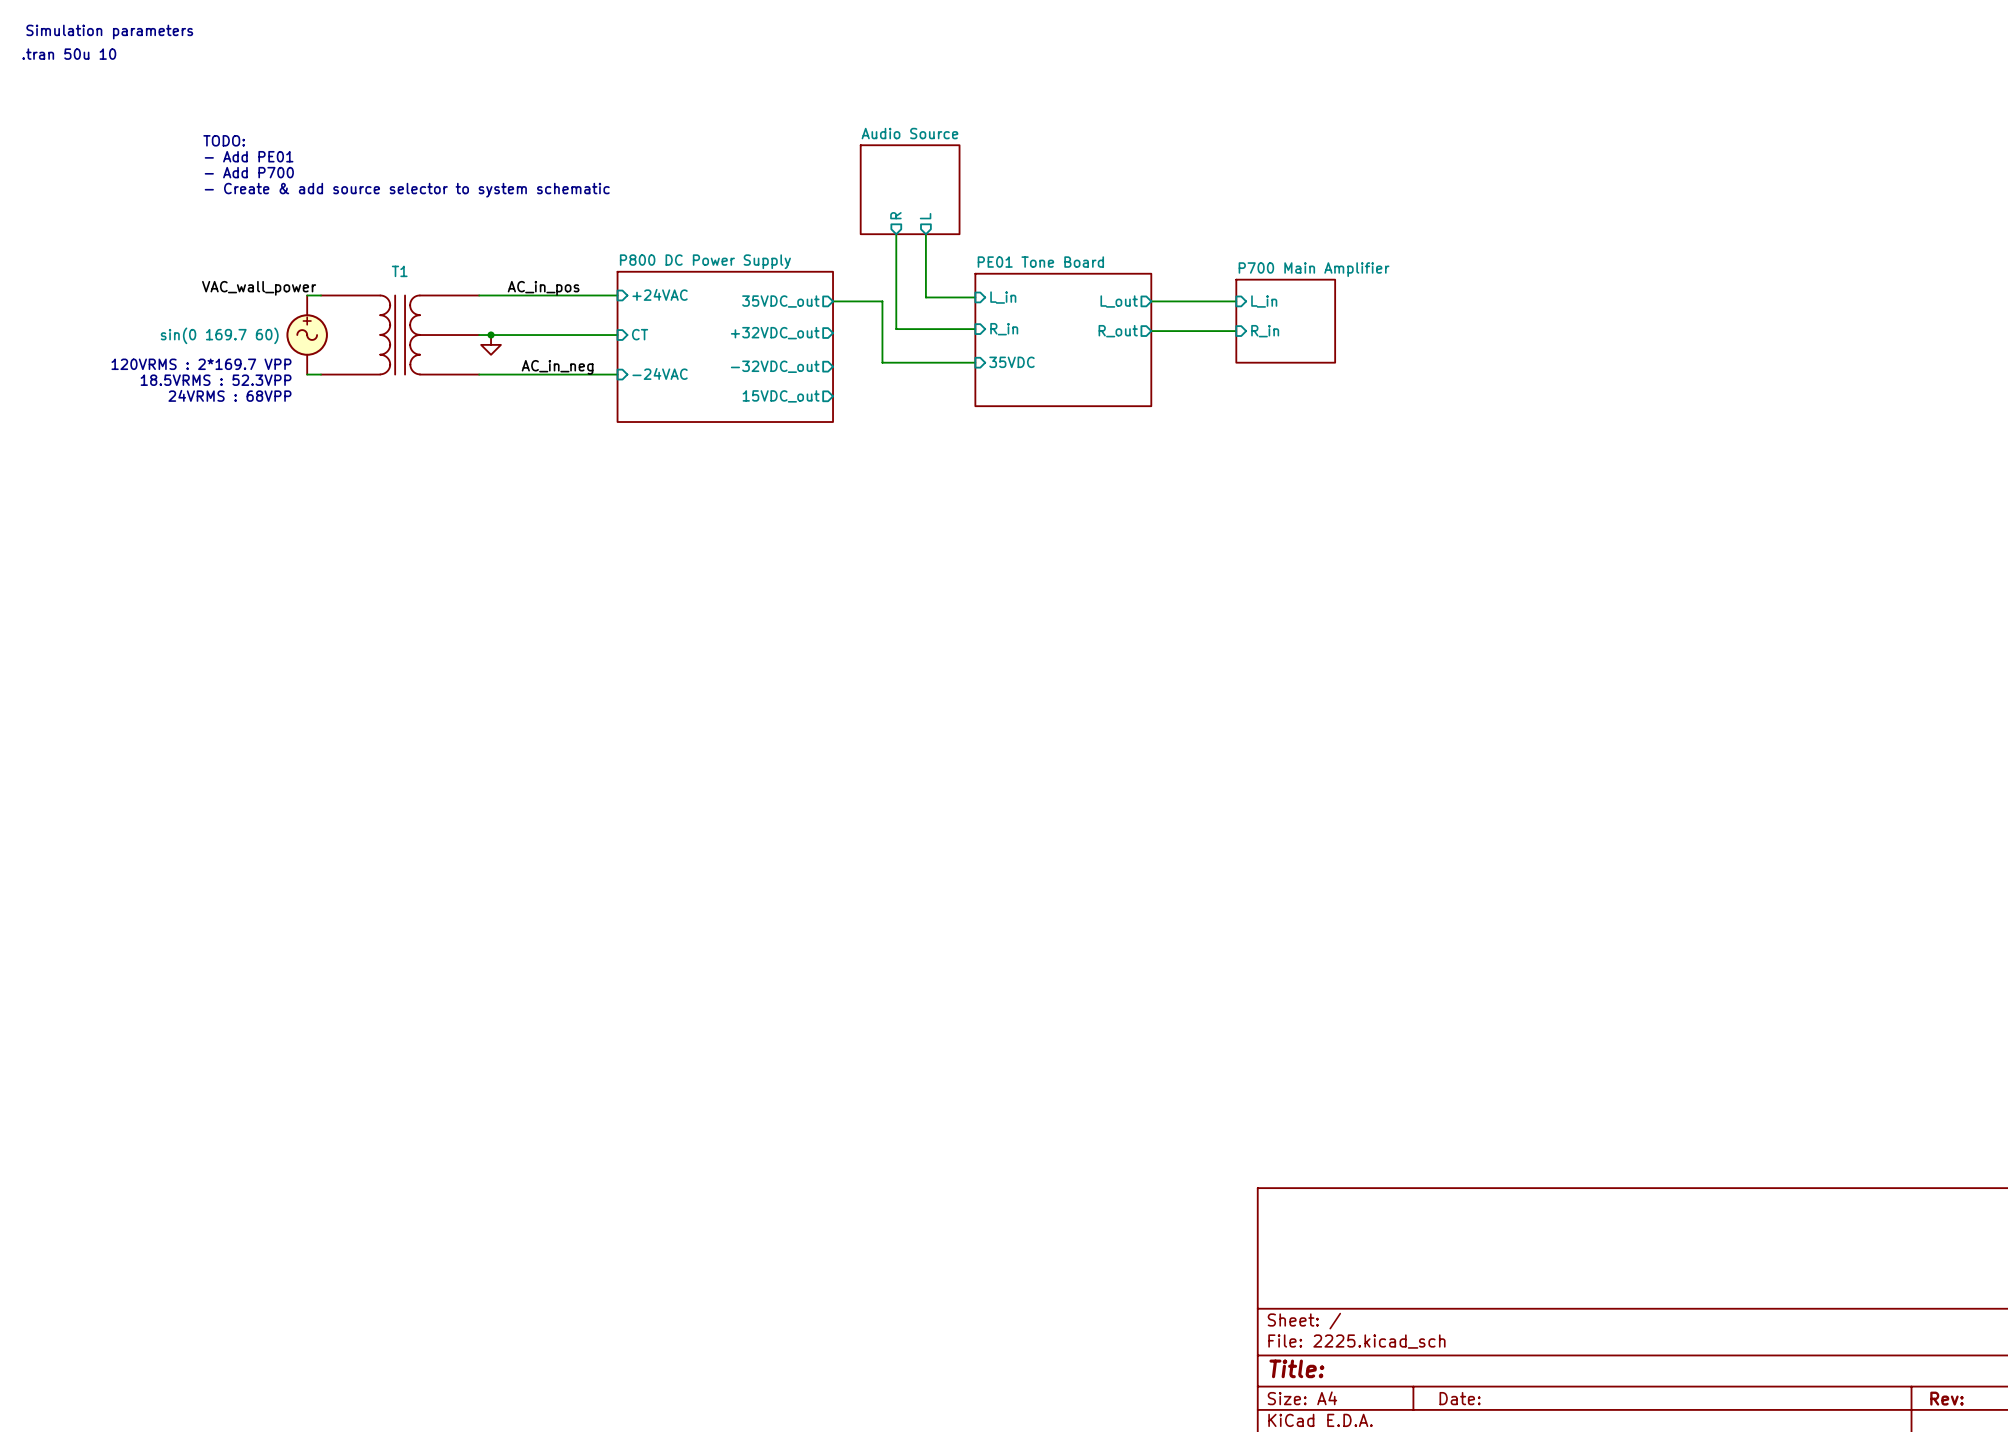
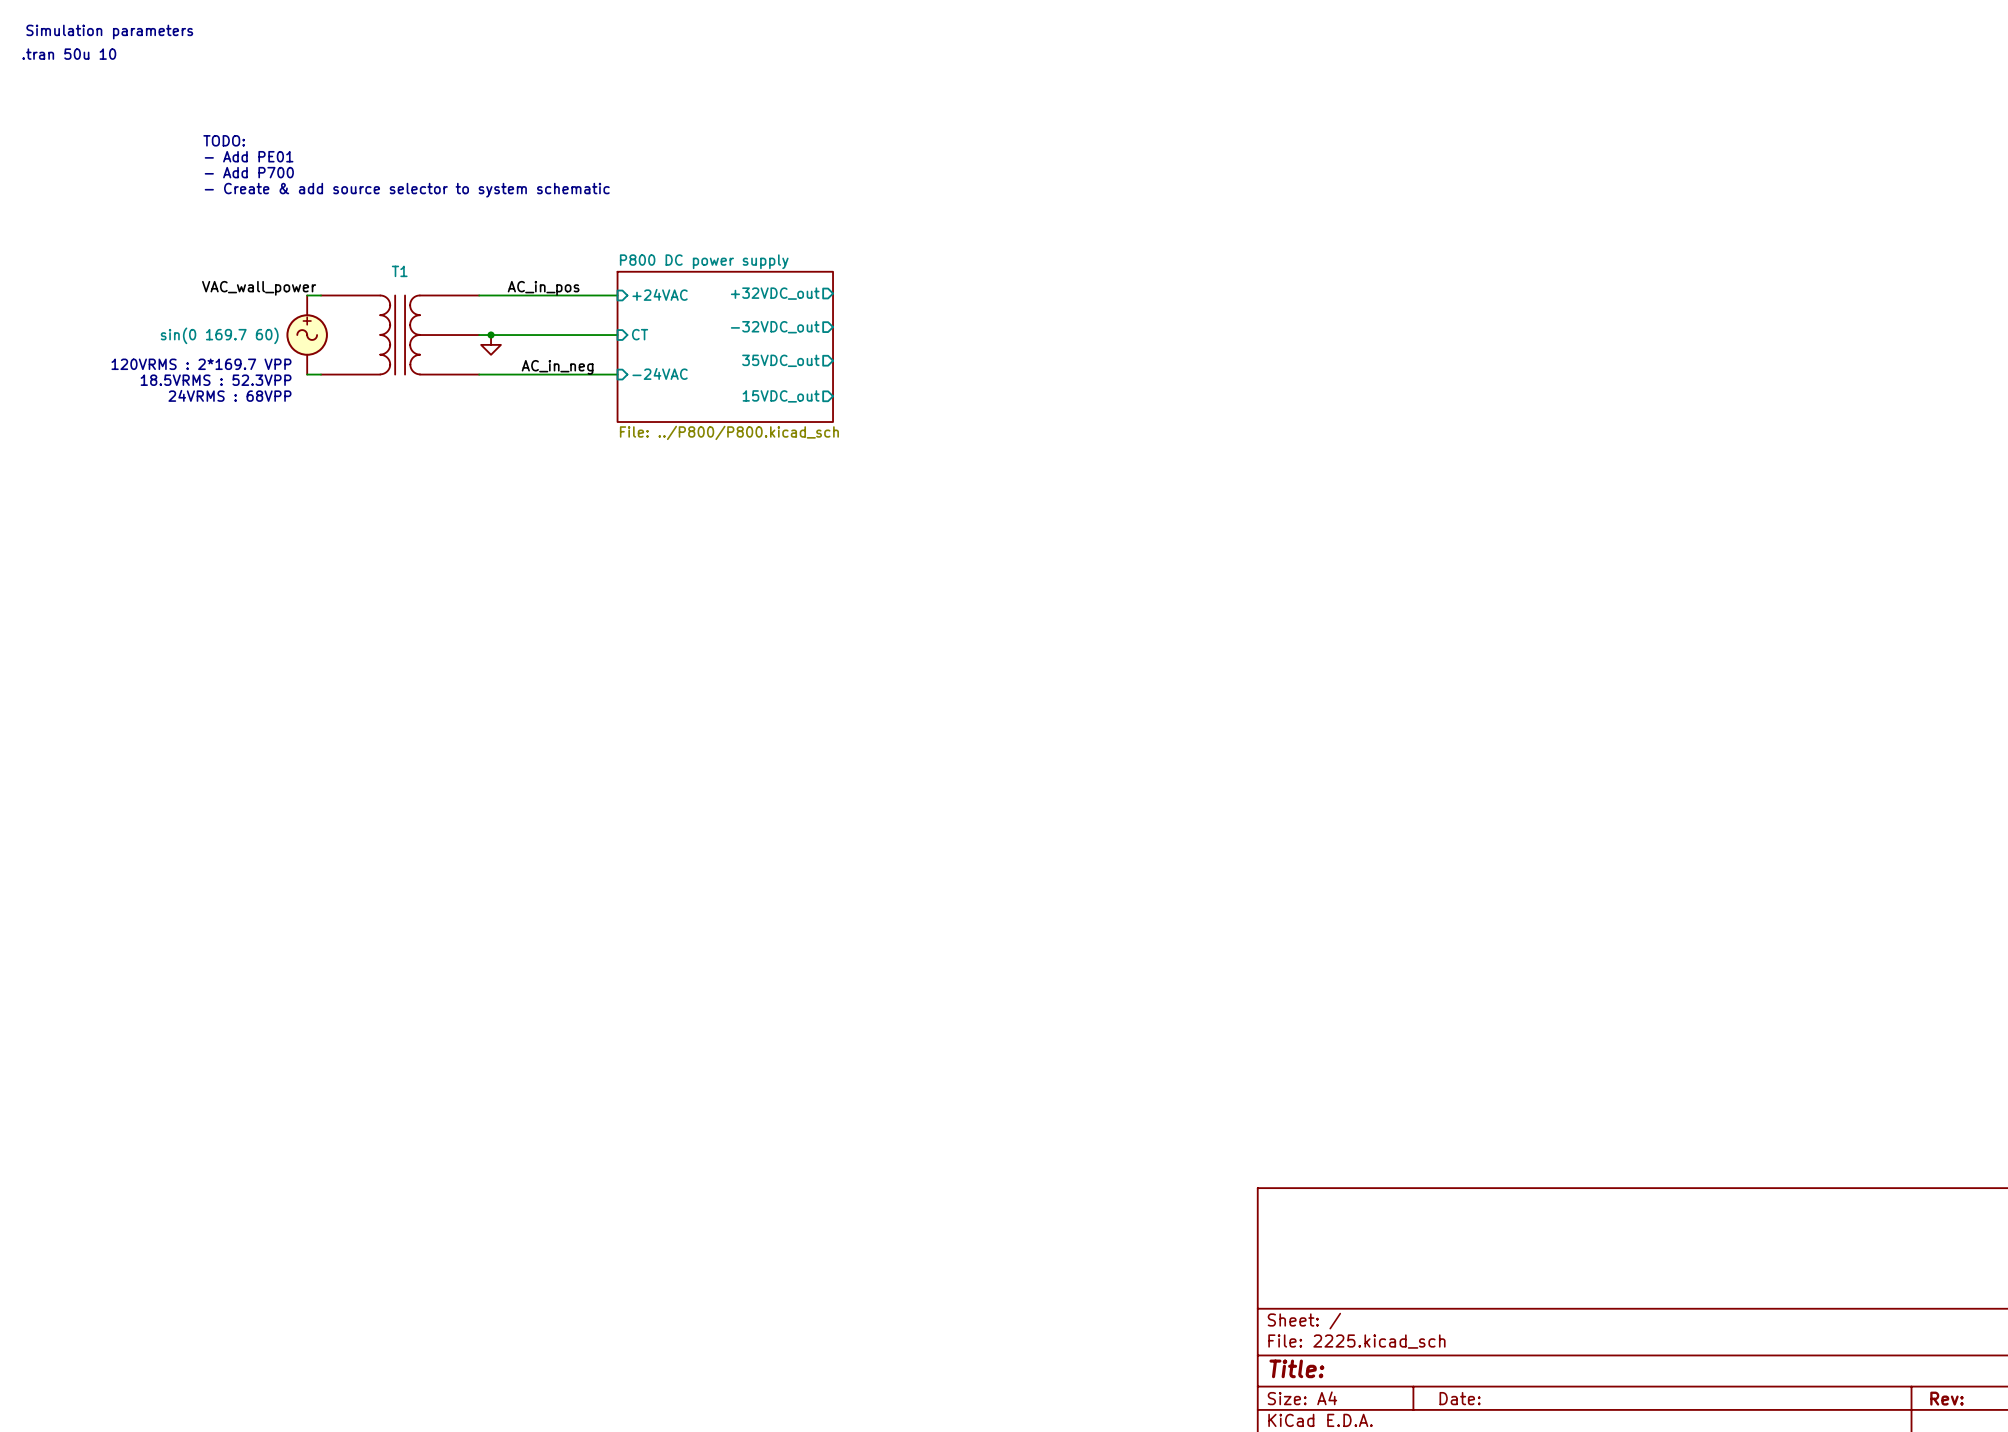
sheet Audio Source: (910, 189) -> none
sheet pin: R (895, 215) -> none
sheet pin: L (925, 216) -> none
wire: (896, 234) (896, 329) (975, 329) -> none
wire: (925, 234) (925, 297) (975, 297) -> none
sheet P800 DC Power Supply name: P800 DC Power Supply (705, 261) -> P800 DC power supply (704, 261)
sheet pin: L_in (1003, 297) -> none
sheet pin position: 35VDC_out (780, 301) -> 35VDC_out (780, 360)
wire: (833, 301) (882, 301) (882, 362) (975, 362) -> none
sheet pin: L_out (1119, 301) -> none
wire: (1151, 301) (1236, 301) -> none
sheet pin: L_in (1264, 301) -> none
sheet P700 Main Amplifier: (1285, 321) -> none
sheet pin: R_in (1004, 329) -> none
sheet pin: R_out (1118, 331) -> none
wire: (1151, 331) (1236, 331) -> none
sheet pin: R_in (1265, 331) -> none
sheet pin position: +32VDC_out (775, 333) -> +32VDC_out (775, 293)
sheet PE01 Tone Board: (1063, 339) -> none
sheet pin: 35VDC (1011, 362) -> none
sheet pin position: -32VDC_out (775, 366) -> -32VDC_out (775, 327)
sheet P800 DC Power Supply value: none -> File: ../P800/P800.kicad_sch (729, 432)

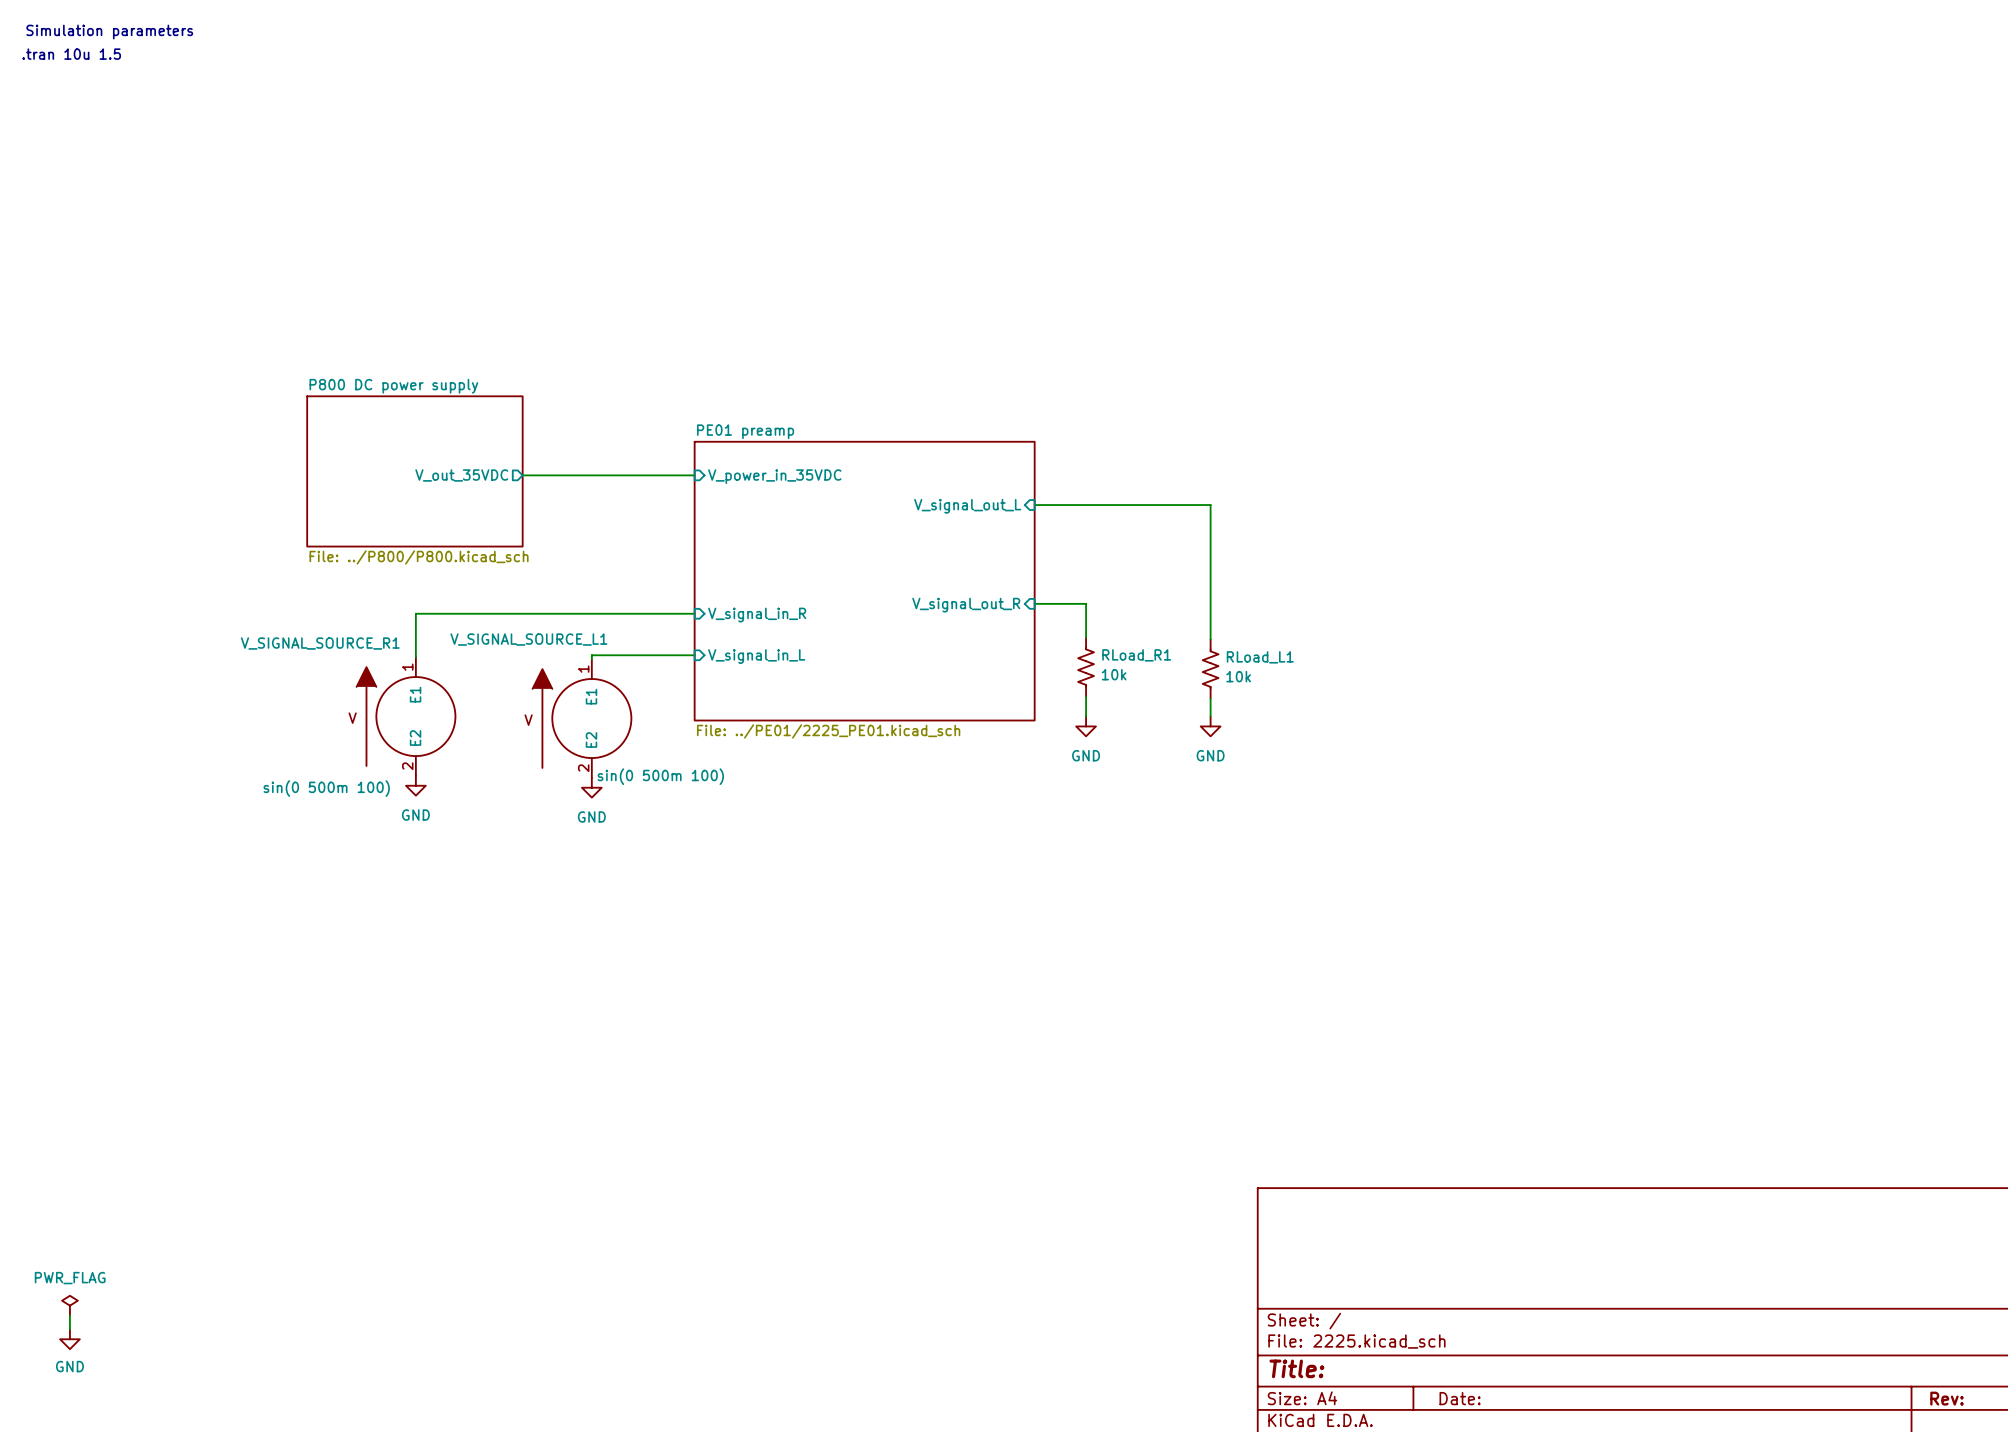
text: .tran 50u 10 (69, 54) -> .tran 10u 1.5 (71, 54)
text: TODO: (224, 140) -> none
text: - Add PE01 (249, 156) -> none
text: - Add P700 (249, 172) -> none
text: - Create & add source selector to system schematic (407, 190) -> none
label: VAC_wall_power (259, 288) -> none
label: AC_in_pos (543, 288) -> none
sheet pin: +32VDC_out (775, 293) -> none
sheet pin: +24VAC (660, 294) -> none
wire: (307, 295) (321, 295) -> none
wire: (479, 295) (617, 295) -> none
sheet pin: -32VDC_out (775, 327) -> none
sheet pin: CT (640, 334) -> none
part: (307, 335) -> none
T1: (400, 335) -> none
wire: (479, 335) (617, 335) -> none
junction: (491, 335) -> none
power symbol: (491, 344) -> none
sheet P800 DC power supply position: (725, 346) -> (414, 471)
sheet pin: 35VDC_out (780, 360) -> none
text: 120VRMS : 2*169.7 VPP (201, 364) -> none
label: AC_in_neg (557, 367) -> none
sheet pin: -24VAC (660, 373) -> none
wire: (307, 374) (321, 374) -> none
wire: (479, 374) (617, 374) -> none
text: 18.5VRMS : 52.3VPP (216, 380) -> none
text: 24VRMS : 68VPP (229, 395) -> none
sheet pin: 15VDC_out (781, 396) -> none
sheet pin: none -> V_out_35VDC (461, 475)
wire: none -> (522, 475) (694, 475)
sheet pin: none -> V_power_in_35VDC (774, 476)
wire: none -> (1034, 505) (1210, 505) (1210, 639)
sheet pin: none -> V_signal_out_L (967, 506)
sheet PE01 preamp: none -> File: ../PE01/2225_PE01.kicad_sch (864, 581)
wire: none -> (1034, 603) (1086, 603) (1086, 637)
sheet pin: none -> V_signal_out_R (966, 605)
wire: none -> (694, 613) (415, 613) (415, 657)
sheet pin: none -> V_signal_in_R (757, 615)
wire: none -> (694, 655) (591, 655) (591, 659)
sheet pin: none -> V_signal_in_L (756, 656)
RLoad_R1: none -> 10k (1086, 667)
RLoad_L1: none -> 10k (1210, 669)
wire: none -> (1086, 696) (1086, 716)
wire: none -> (1210, 698) (1210, 716)
V_SIGNAL_SOURCE_R1: none -> (406, 716)
V_SIGNAL_SOURCE_L1: none -> (581, 718)
power symbol: none -> GND (1086, 726)
power symbol: none -> GND (1210, 726)
power symbol: none -> GND (415, 785)
power symbol: none -> GND (591, 787)
power symbol: none -> PWR_FLAG (69, 1305)
wire: none -> (69, 1315) (69, 1329)
power symbol: none -> GND (69, 1339)

